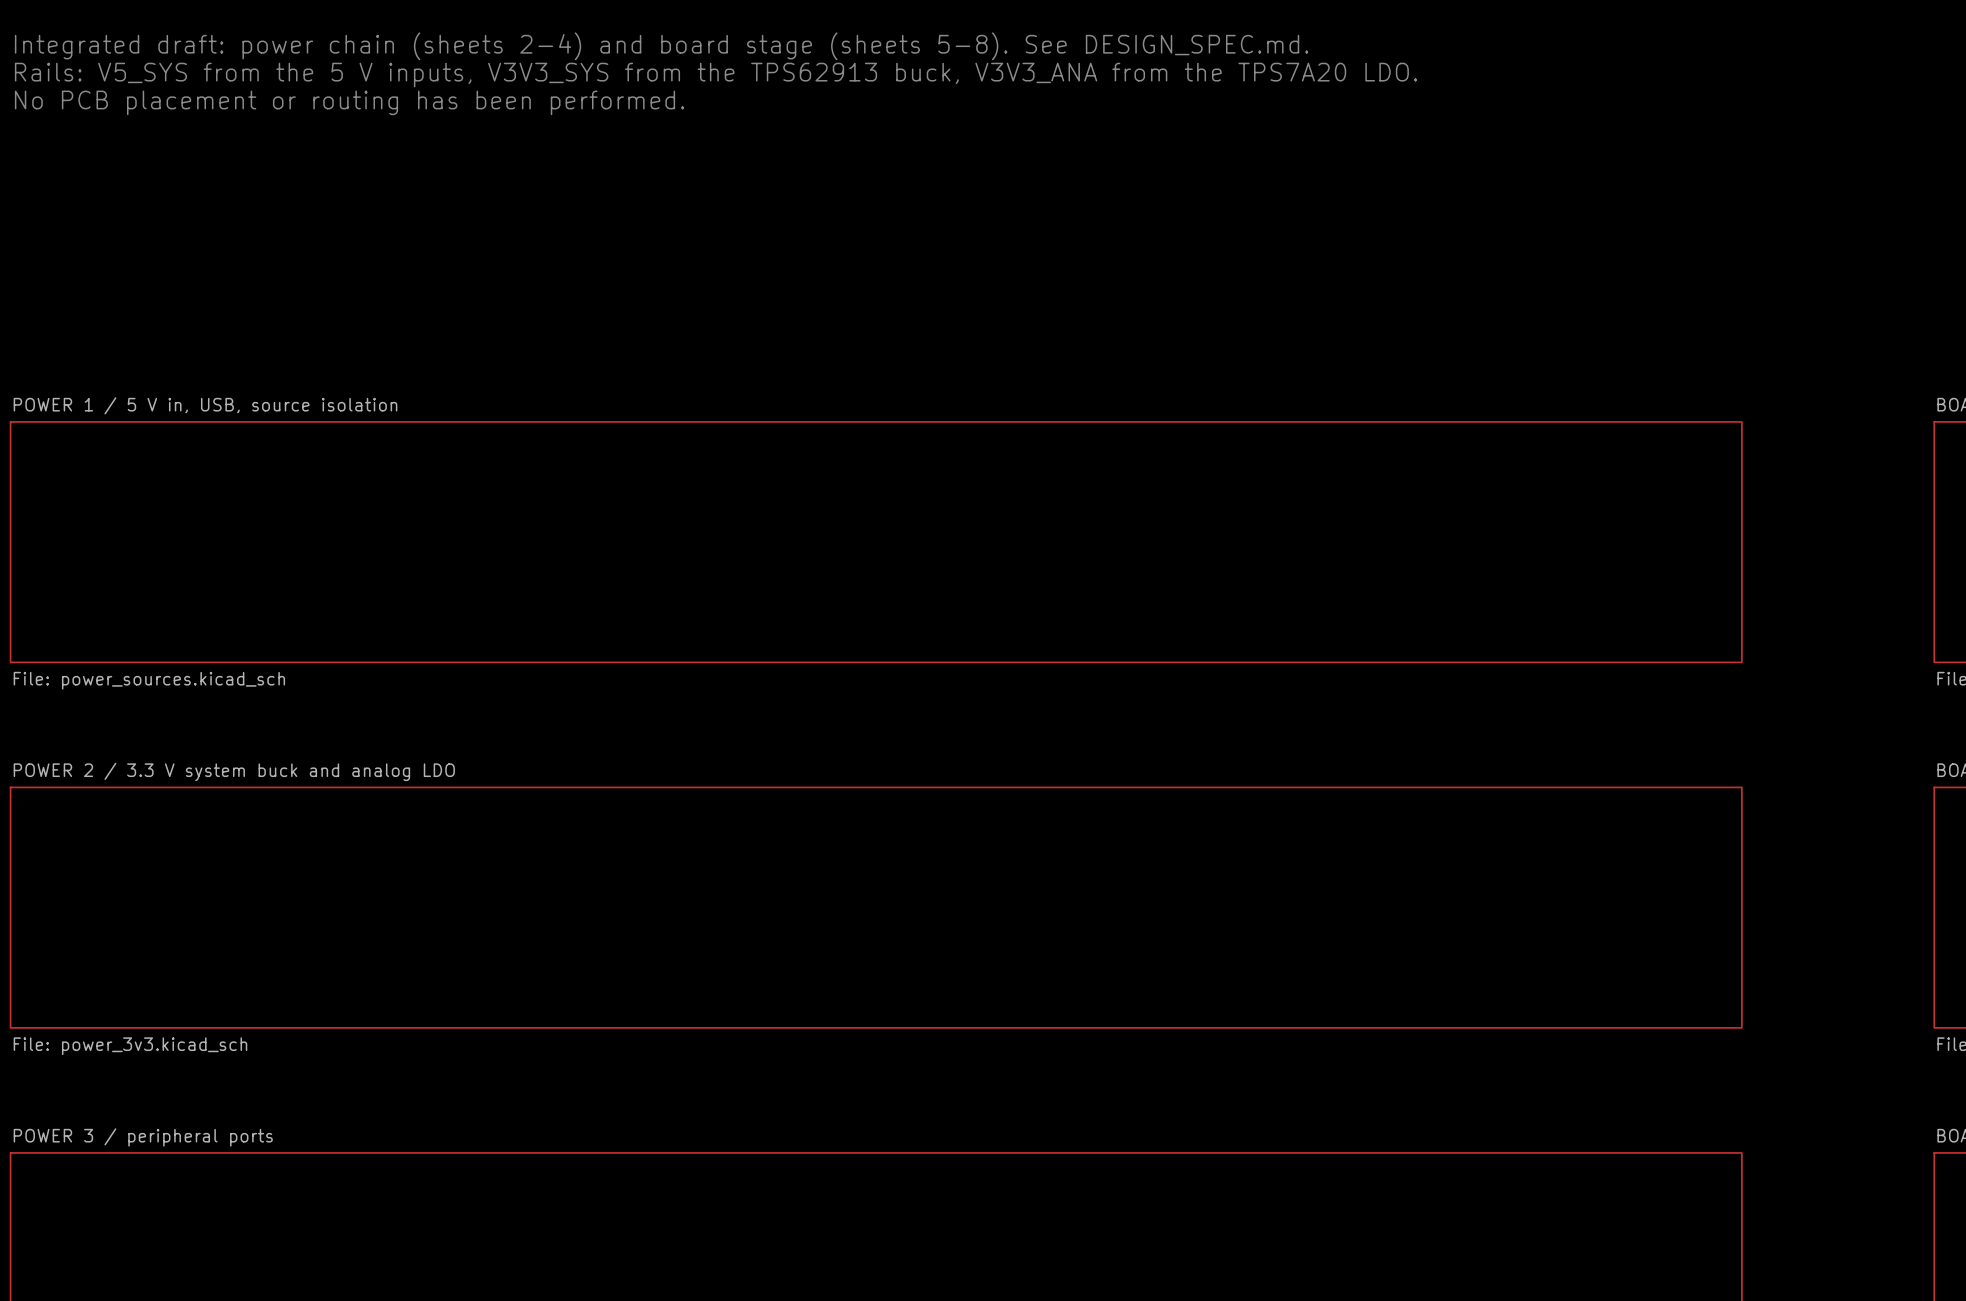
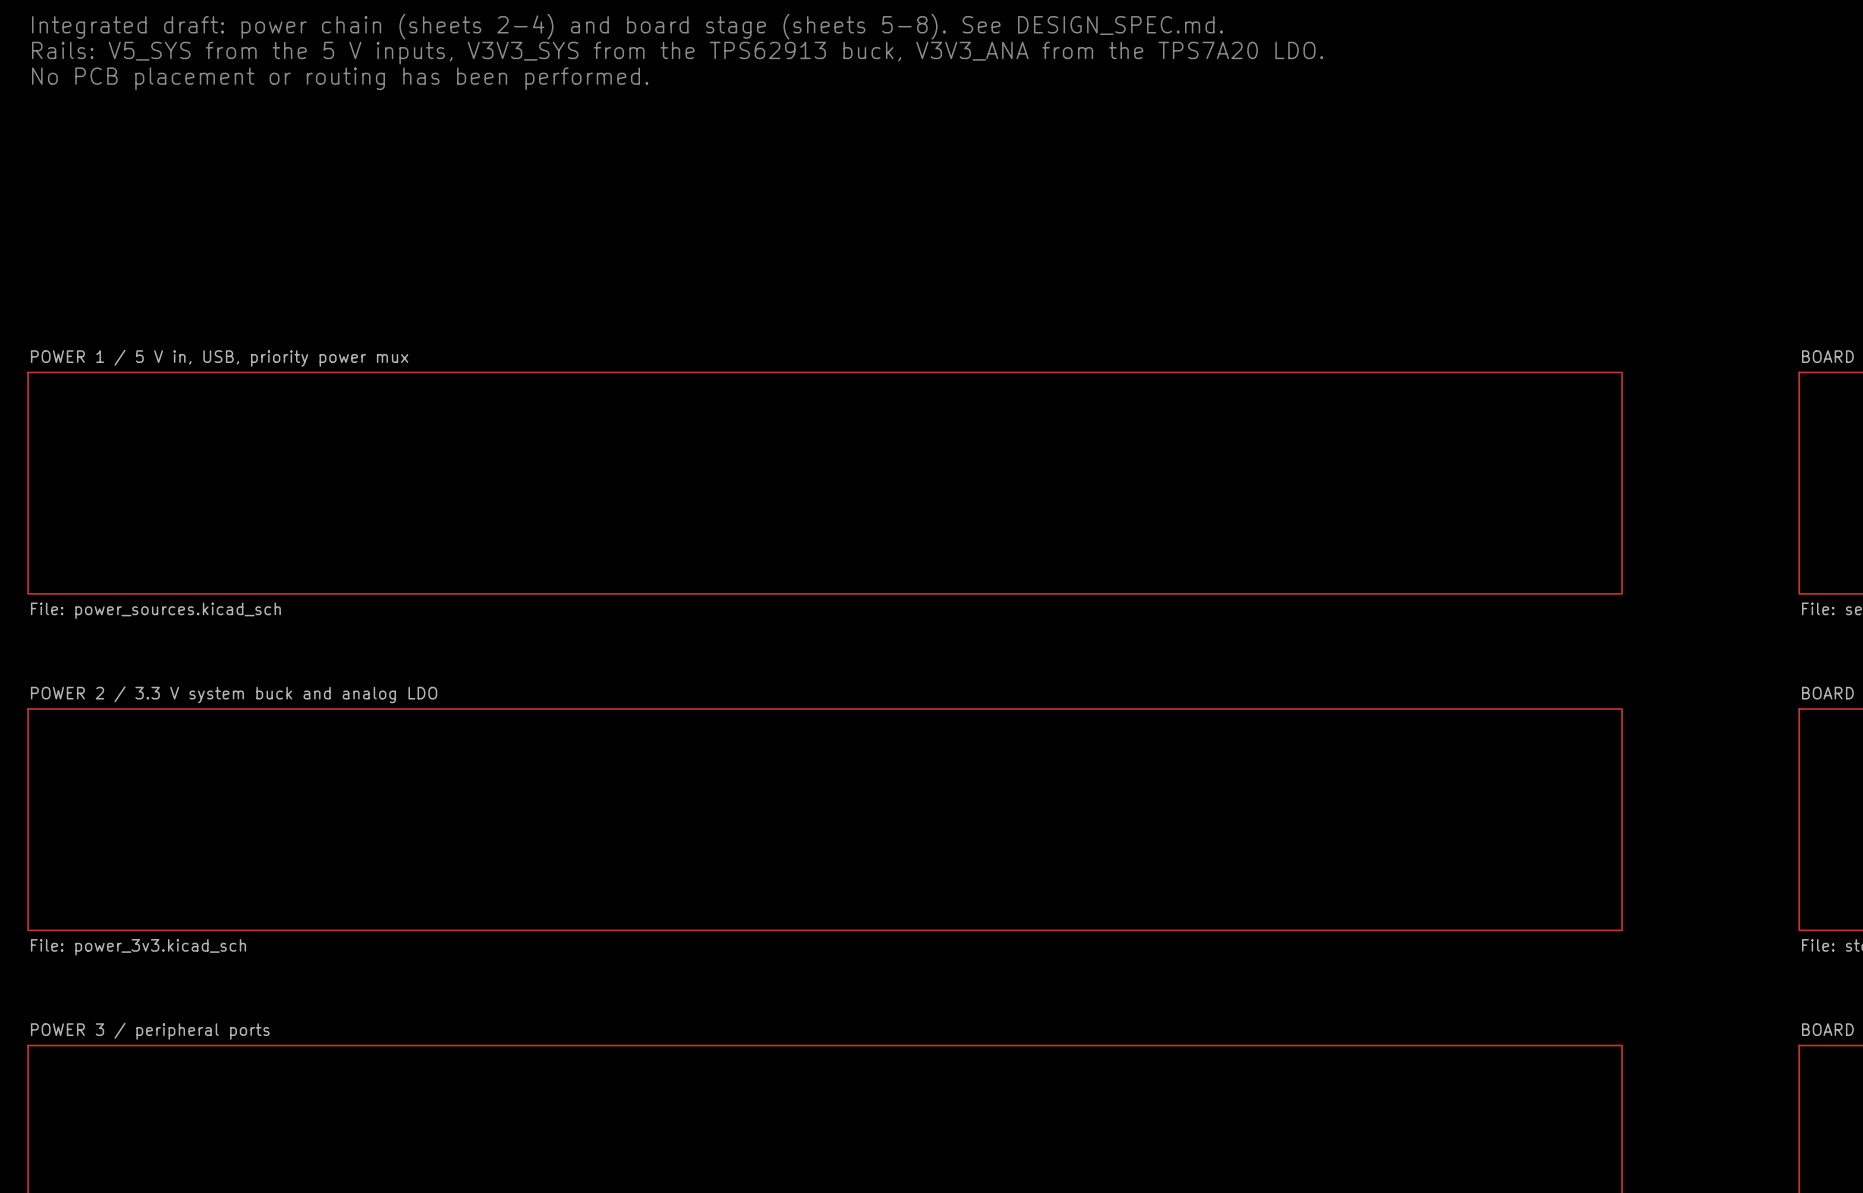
sheet POWER 1 / 5 V in, USB, source isolation name: POWER 1 / 5 V in, USB, source isolation (205, 405) -> POWER 1 / 5 V in, USB, priority power mux (219, 358)

